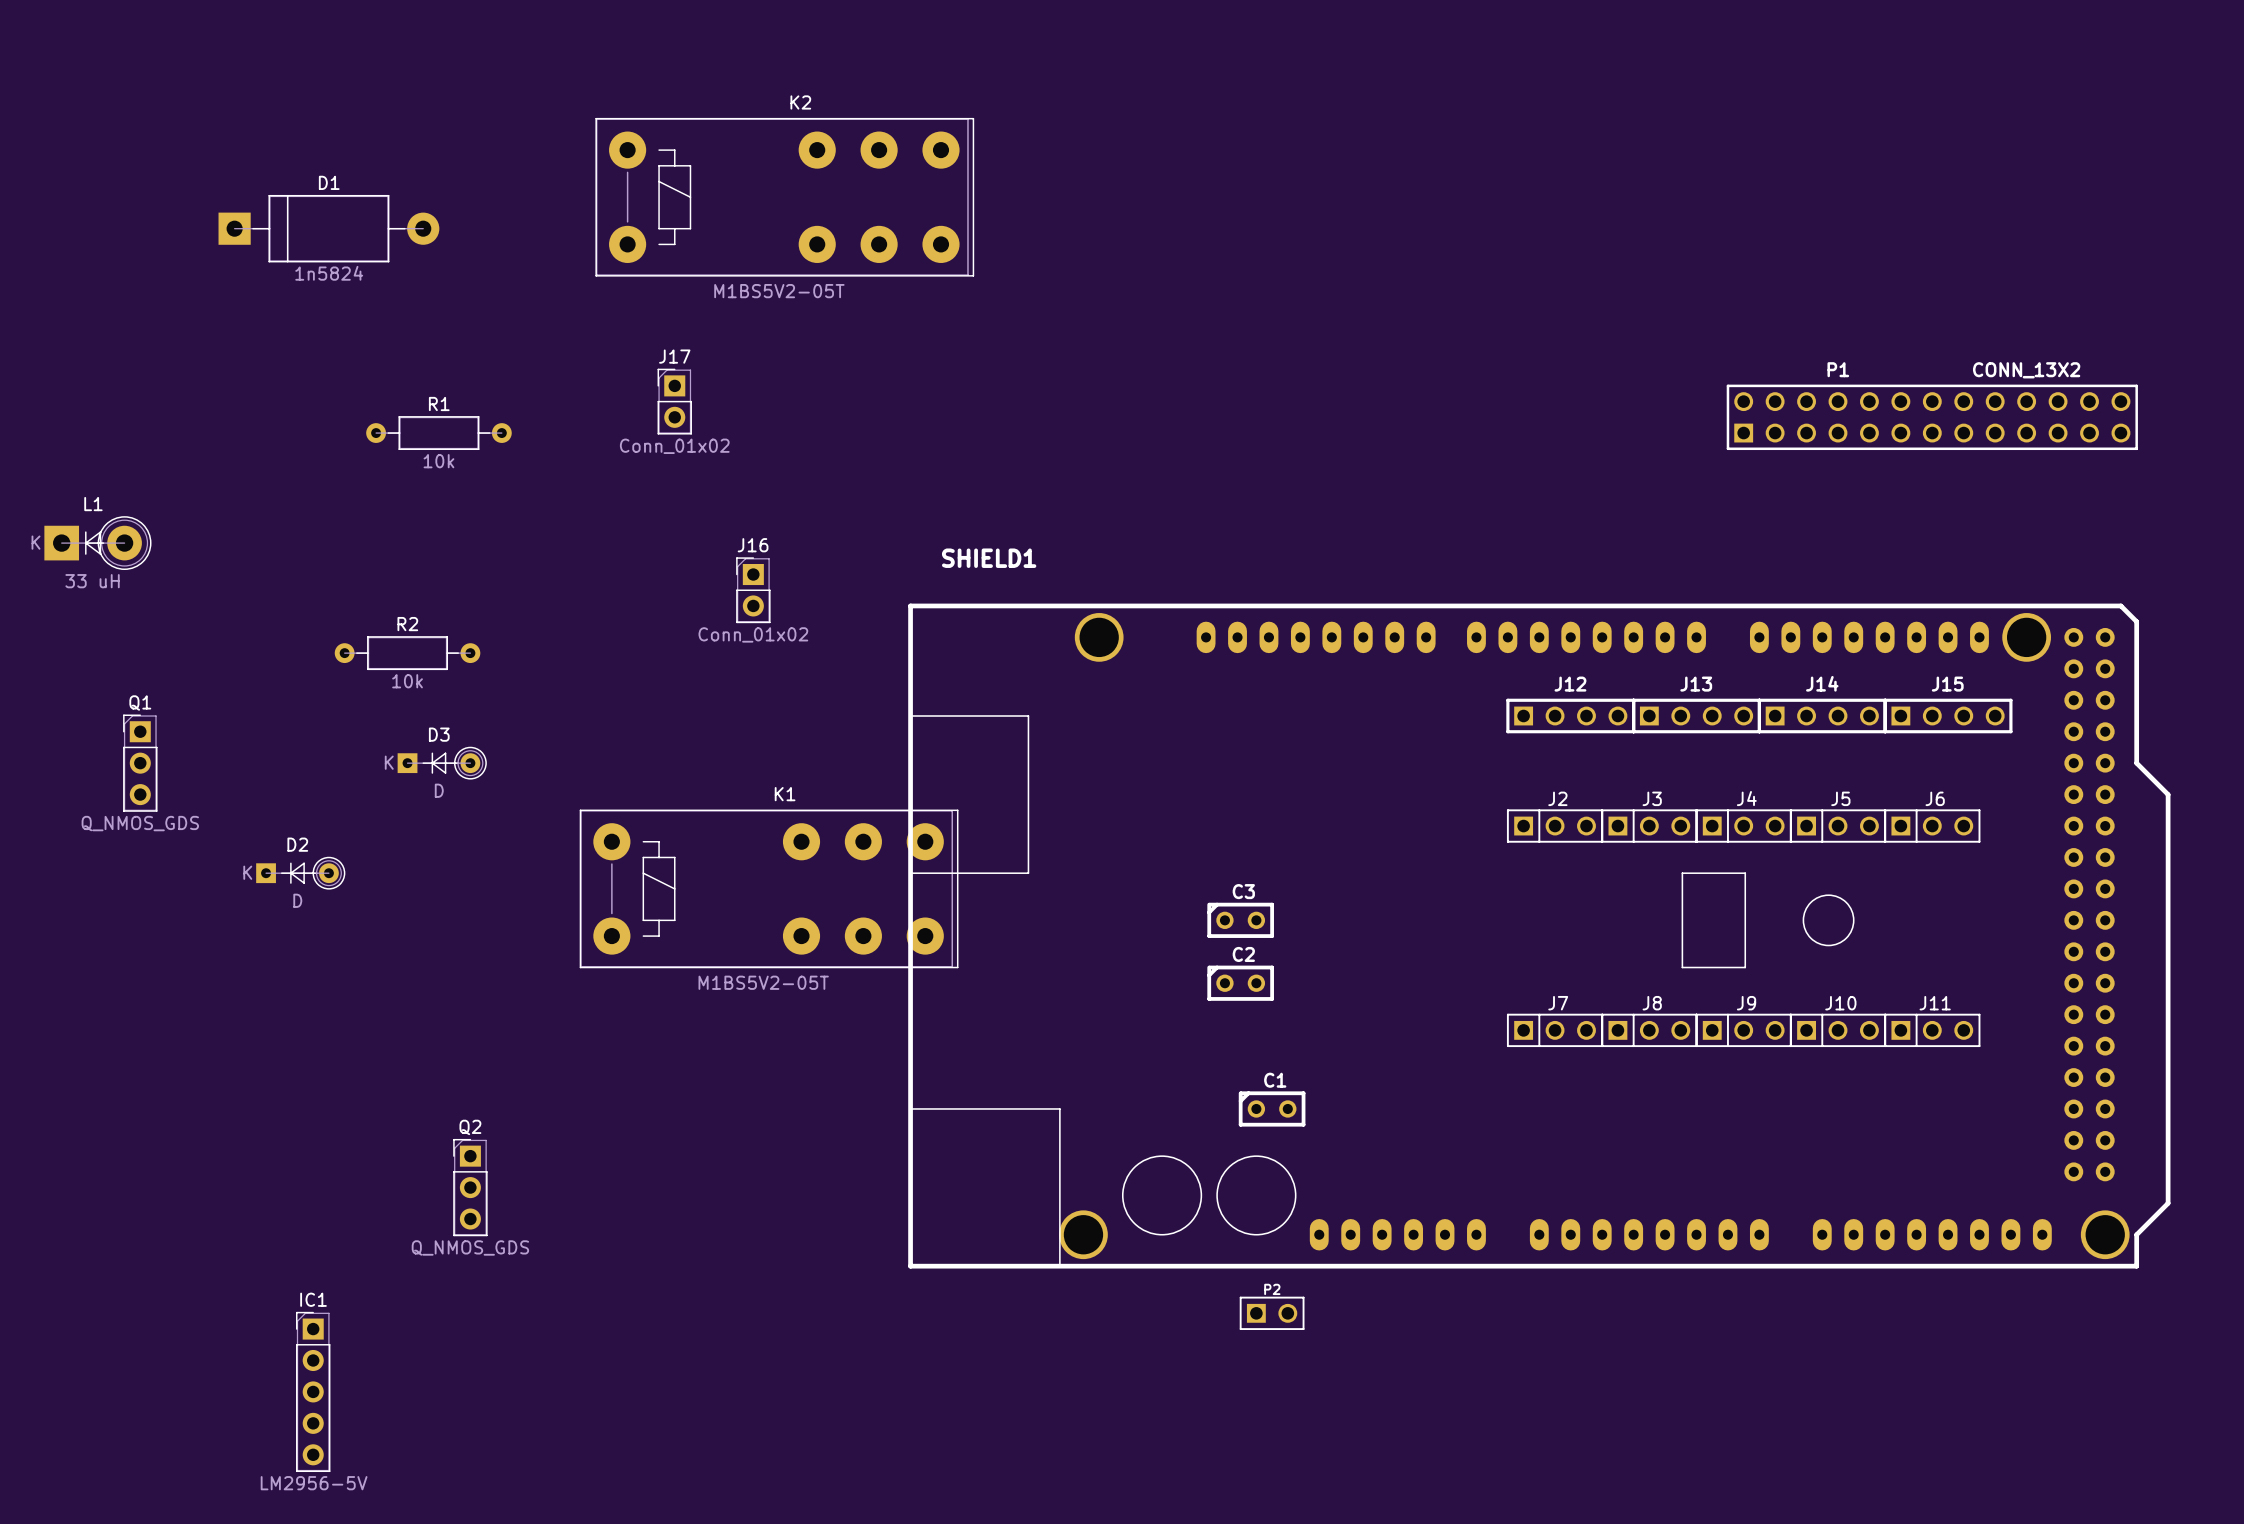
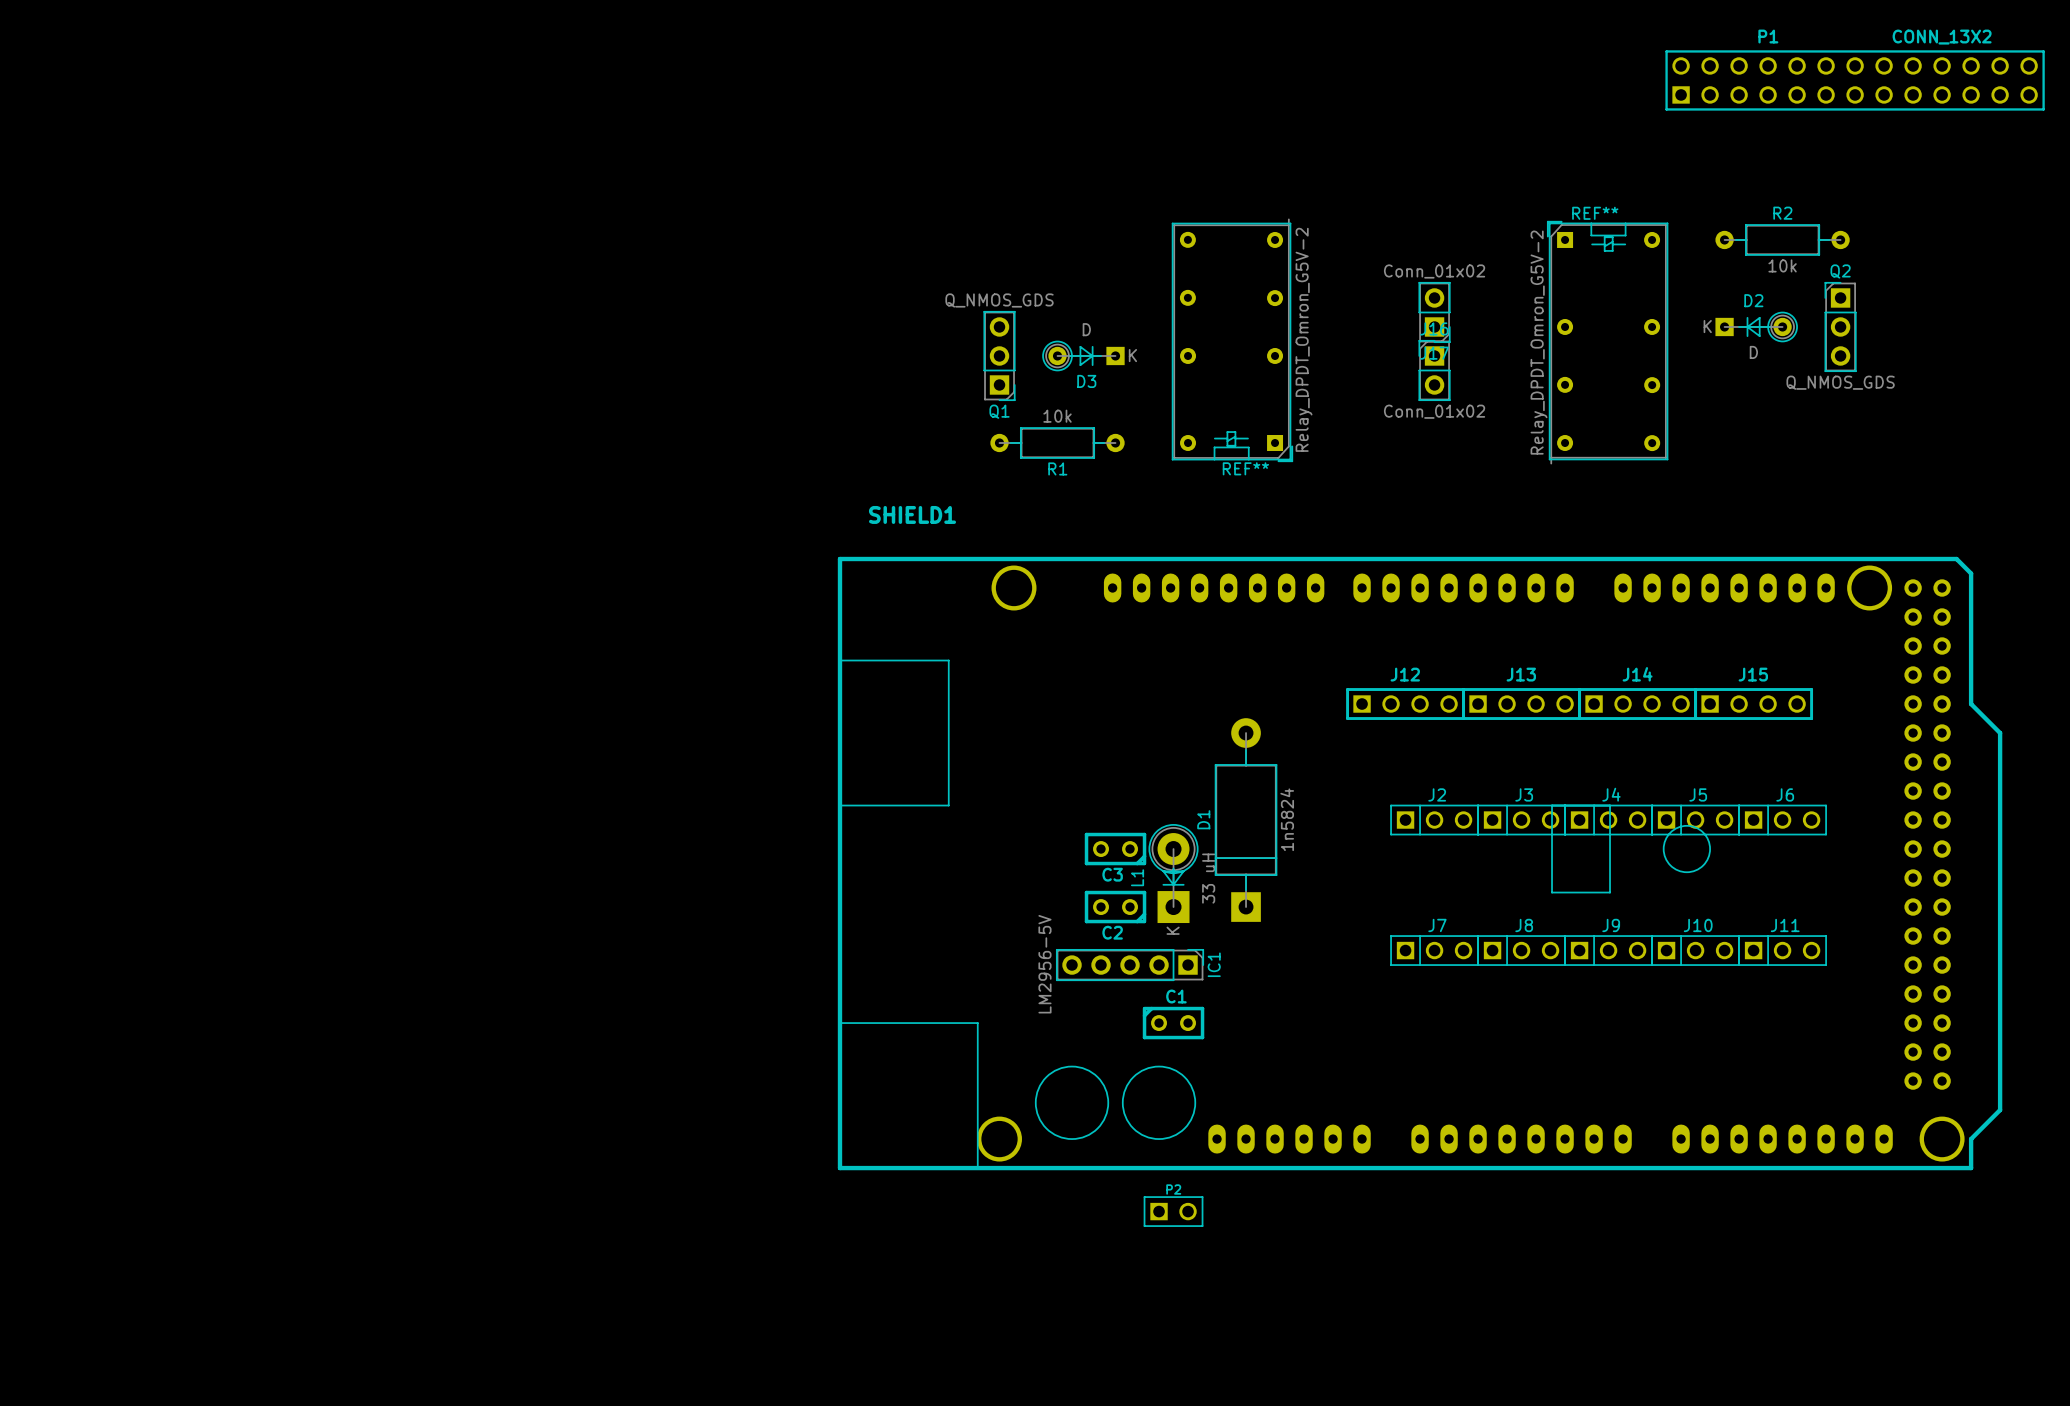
K2: M1BS5V2-05T (784, 197) -> none
D1 rotation: 0° (328, 228) -> 90° counterclockwise (1246, 820)
D1 position: (328, 228) -> (1246, 820)
REF**: none -> Relay_DPDT_Omron_G5V-2 (1232, 340)
REF**: none -> Relay_DPDT_Omron_G5V-2 (1607, 342)
J17 rotation: 0° (674, 401) -> 180° (1434, 312)
J17 position: (674, 401) -> (1434, 312)
R1 name position: R1 (439, 403) -> R1 (1057, 468)
P1 position: (1932, 417) -> (1855, 80)
R1 position: (438, 433) -> (1057, 442)
R1 value position: 10k (438, 461) -> 10k (1057, 416)
L1 rotation: 0° (97, 543) -> 90° counterclockwise (1173, 873)
L1 position: (97, 543) -> (1173, 873)
J16 position: (753, 590) -> (1434, 370)
R2 position: (407, 653) -> (1782, 239)
J12 position: (1570, 716) -> (1405, 704)
J13 position: (1696, 716) -> (1521, 704)
J14 position: (1822, 716) -> (1637, 704)
J15 position: (1948, 716) -> (1753, 704)
Q1 rotation: 0° (140, 763) -> 180° (999, 355)
Q1 position: (140, 763) -> (999, 355)
D3 rotation: 0° (442, 763) -> 180° (1083, 355)
D3 position: (442, 763) -> (1083, 355)
J2 position: (1555, 826) -> (1434, 820)
J3 position: (1649, 826) -> (1521, 820)
J4 position: (1743, 826) -> (1608, 820)
J5 position: (1838, 826) -> (1695, 820)
J6 position: (1932, 826) -> (1782, 820)
D2 position: (300, 873) -> (1756, 326)
K1: M1BS5V2-05T (769, 888) -> none
C3 rotation: 0° (1240, 920) -> 180° (1115, 849)
C2 rotation: 0° (1240, 983) -> 180° (1115, 907)
Q2 position: (470, 1187) -> (1840, 326)
IC1 rotation: 0° (313, 1391) -> 90° clockwise (1130, 965)
IC1 position: (313, 1391) -> (1130, 965)

